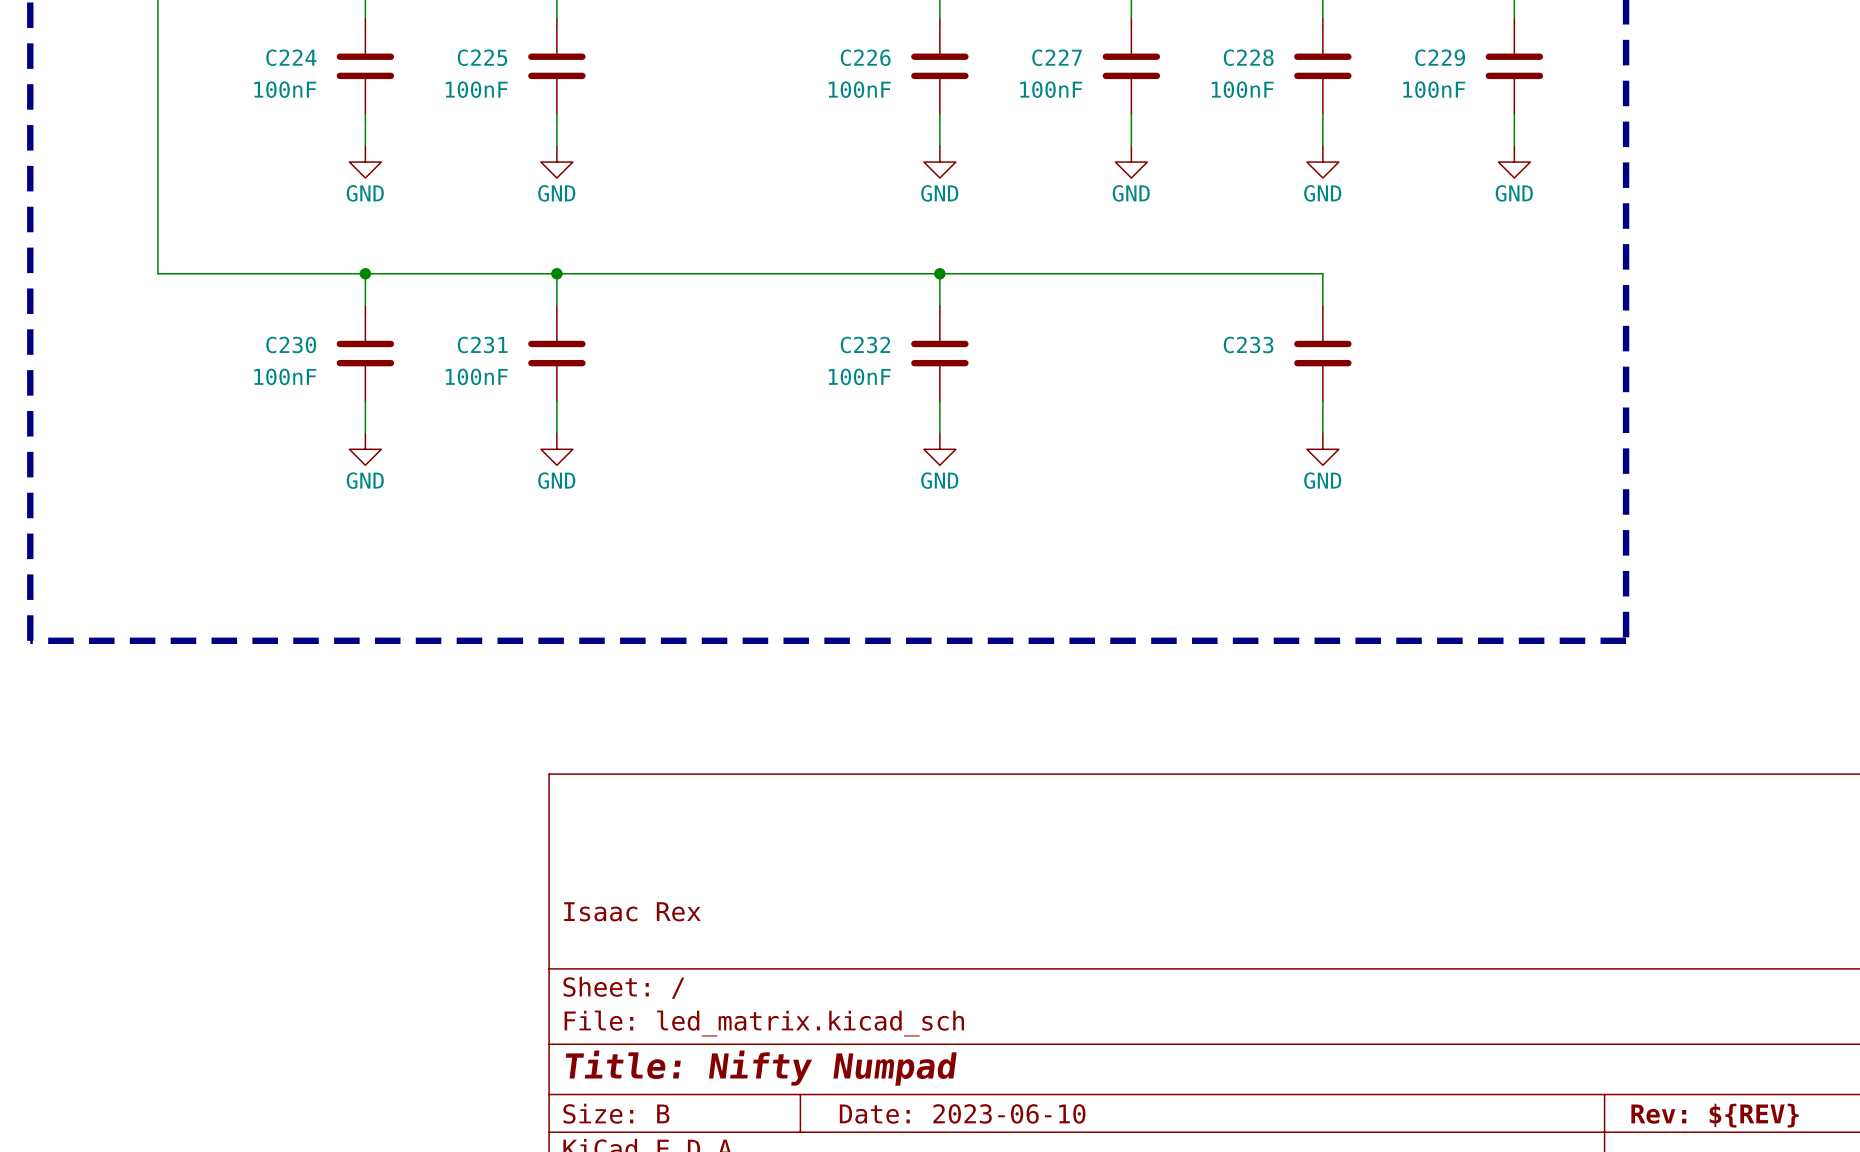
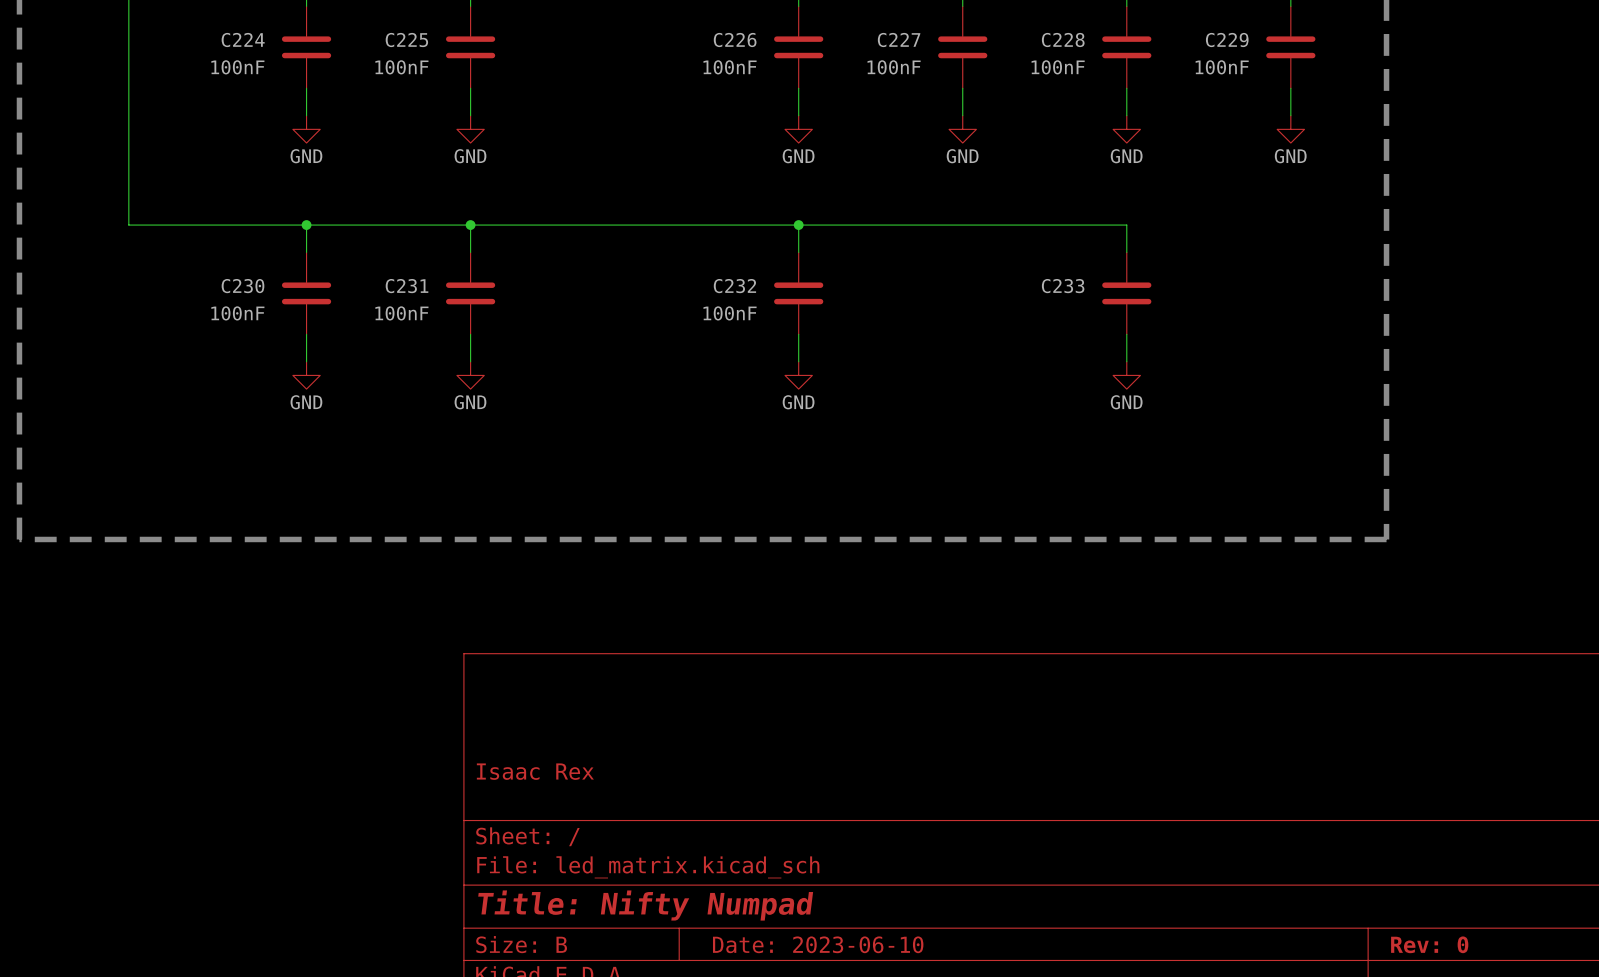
title block: Rev: ${REV} (1715, 1115) -> Rev: 0 (1429, 944)

